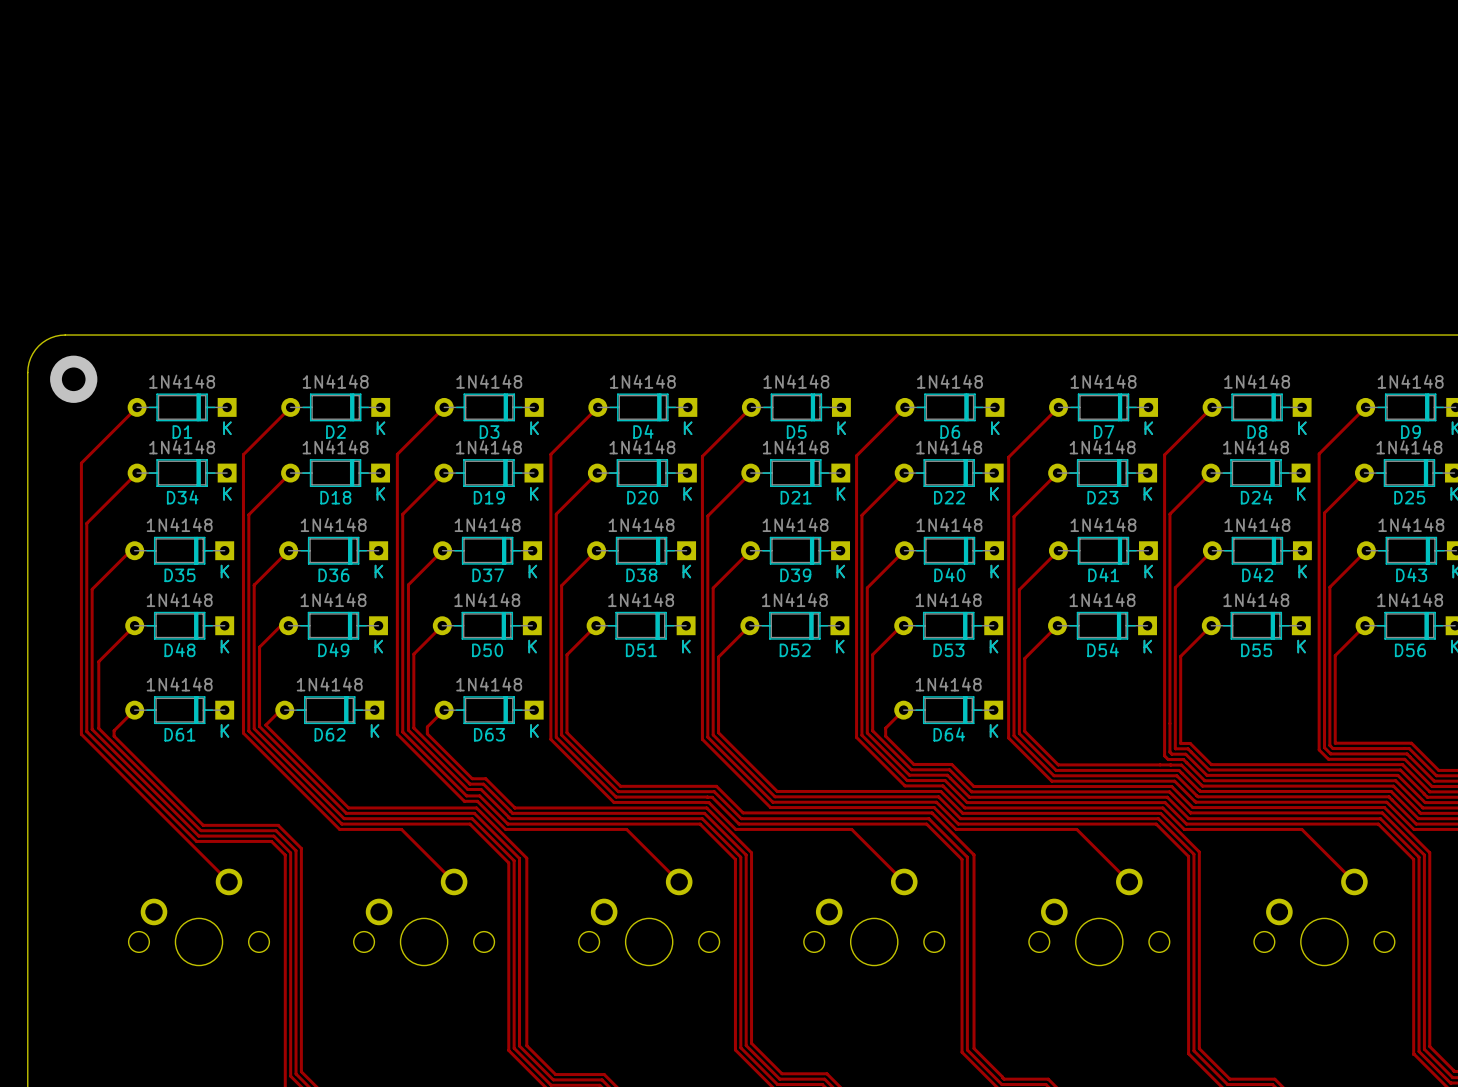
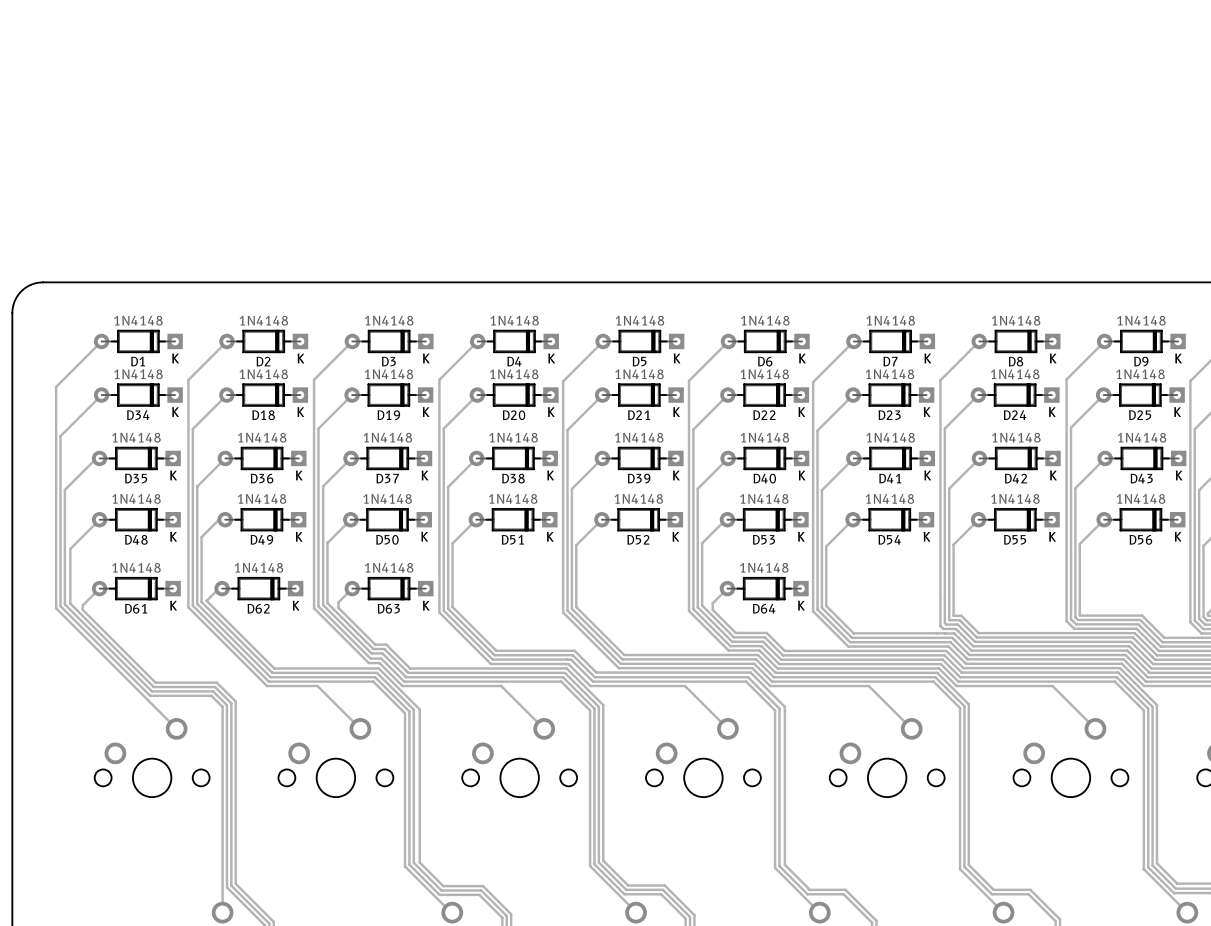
via: (73, 379) -> none

